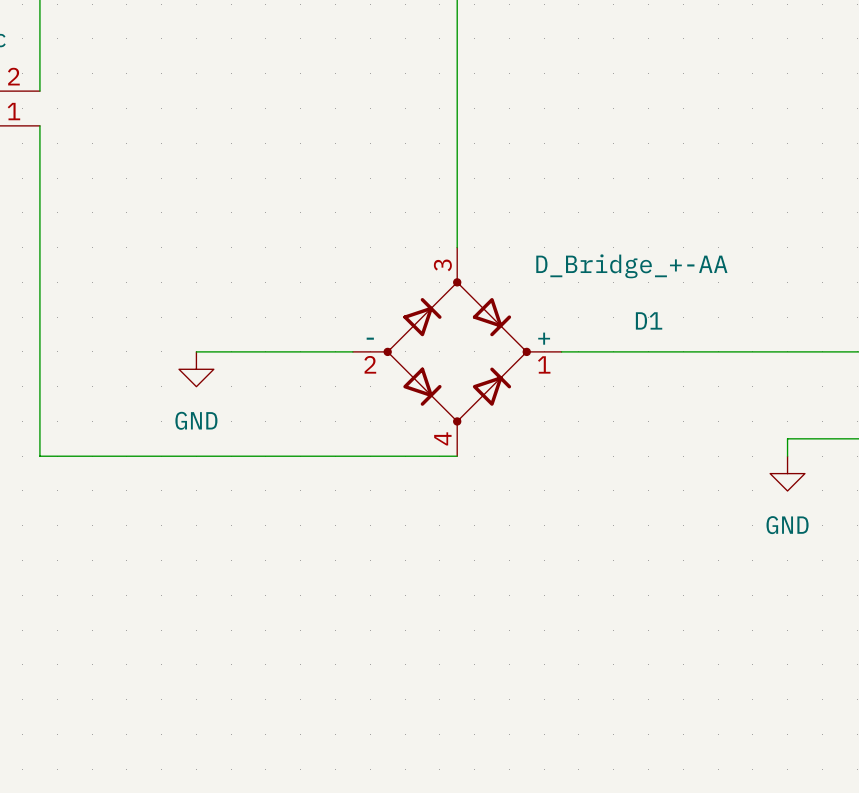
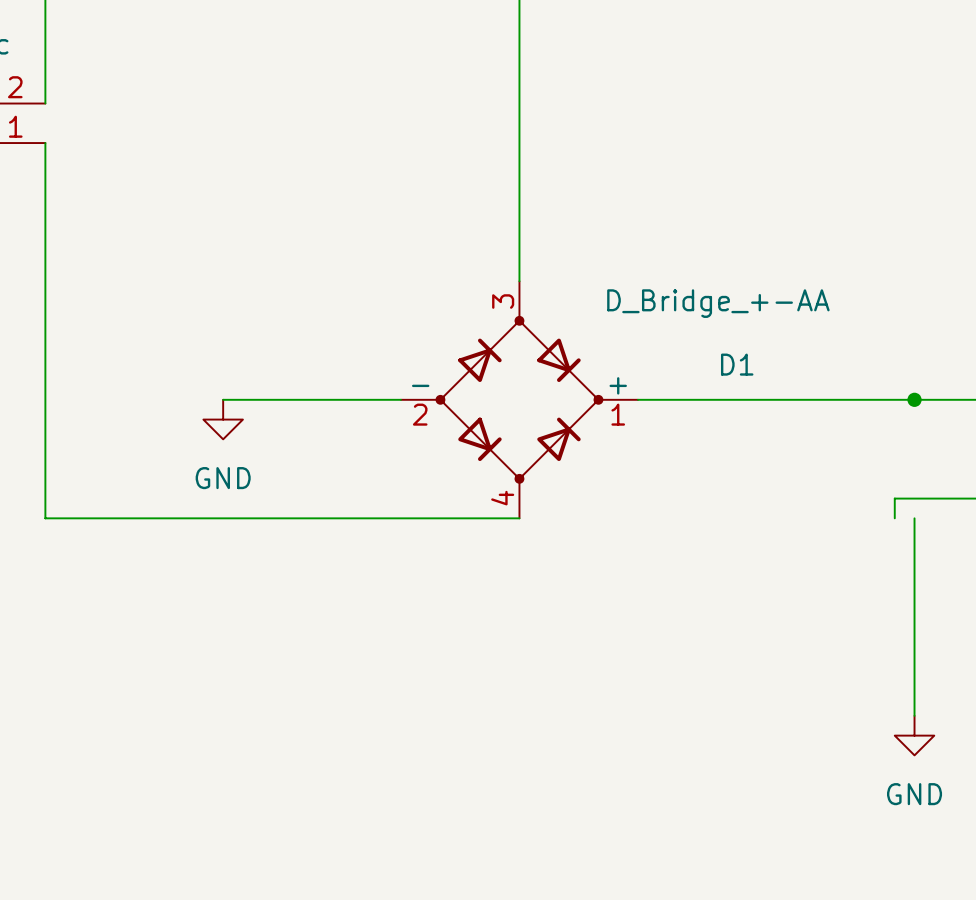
junction: none -> (914, 399)
wire: none -> (914, 518) (914, 715)
power symbol position: GND (787, 473) -> GND (914, 735)

